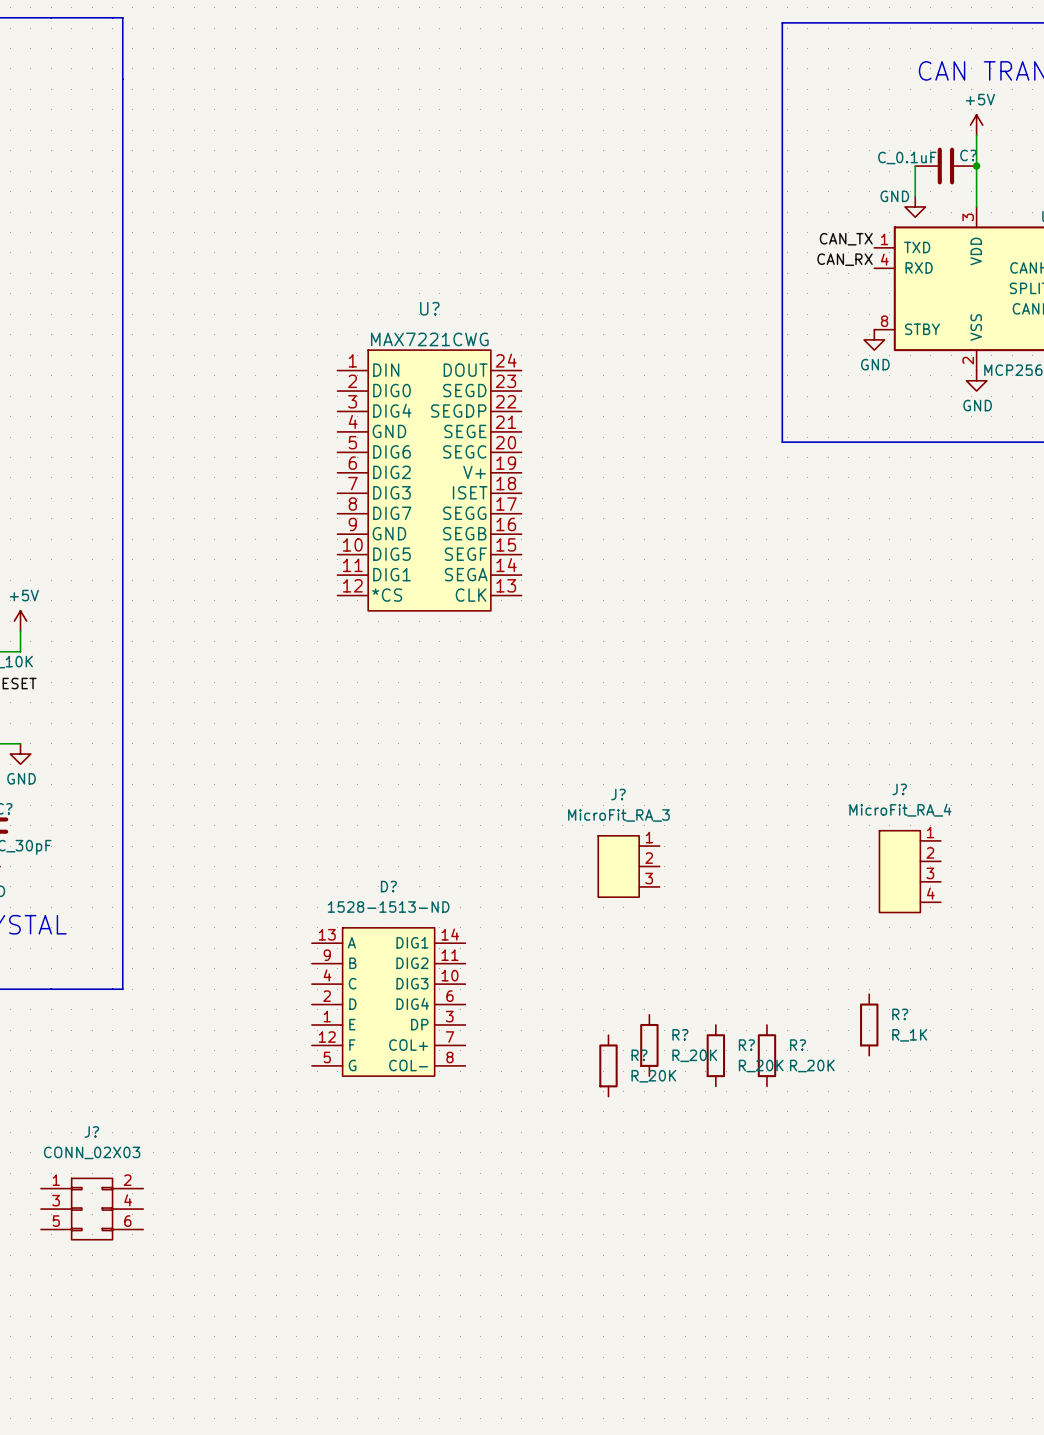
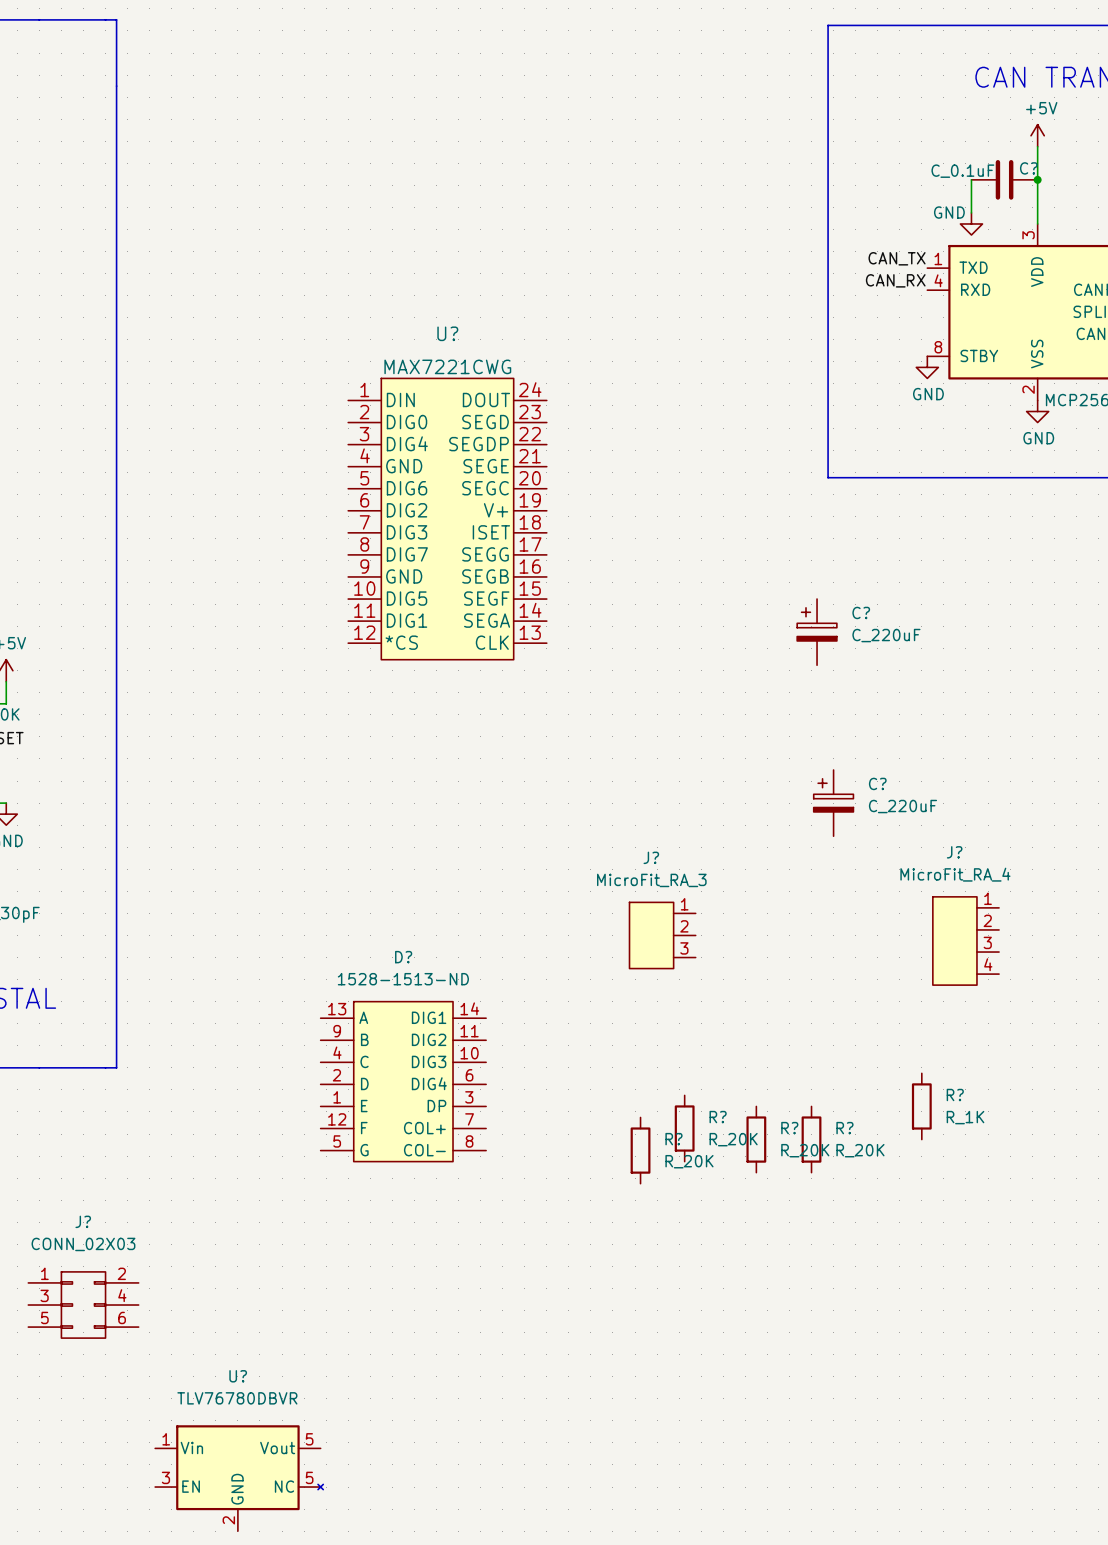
C?: none -> C_220uF (817, 632)
C?: none -> C_220uF (833, 803)
U?: none -> TLV76780DBVR (239, 1478)

